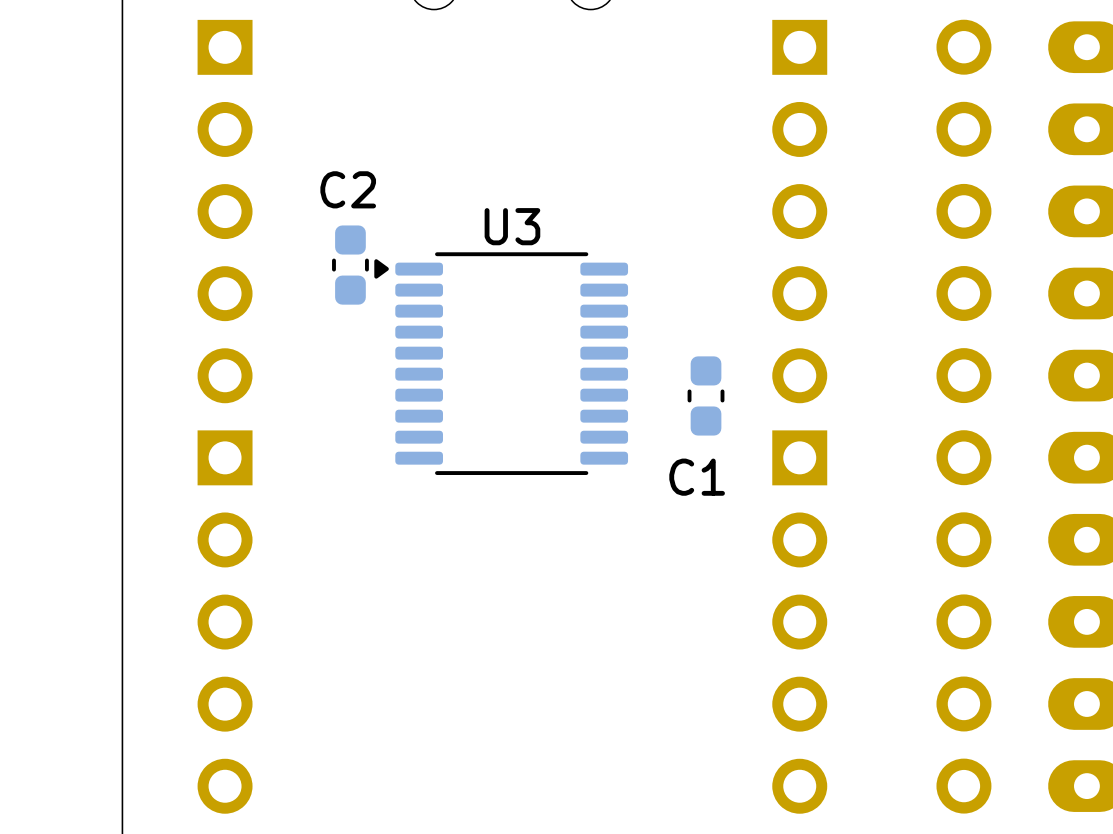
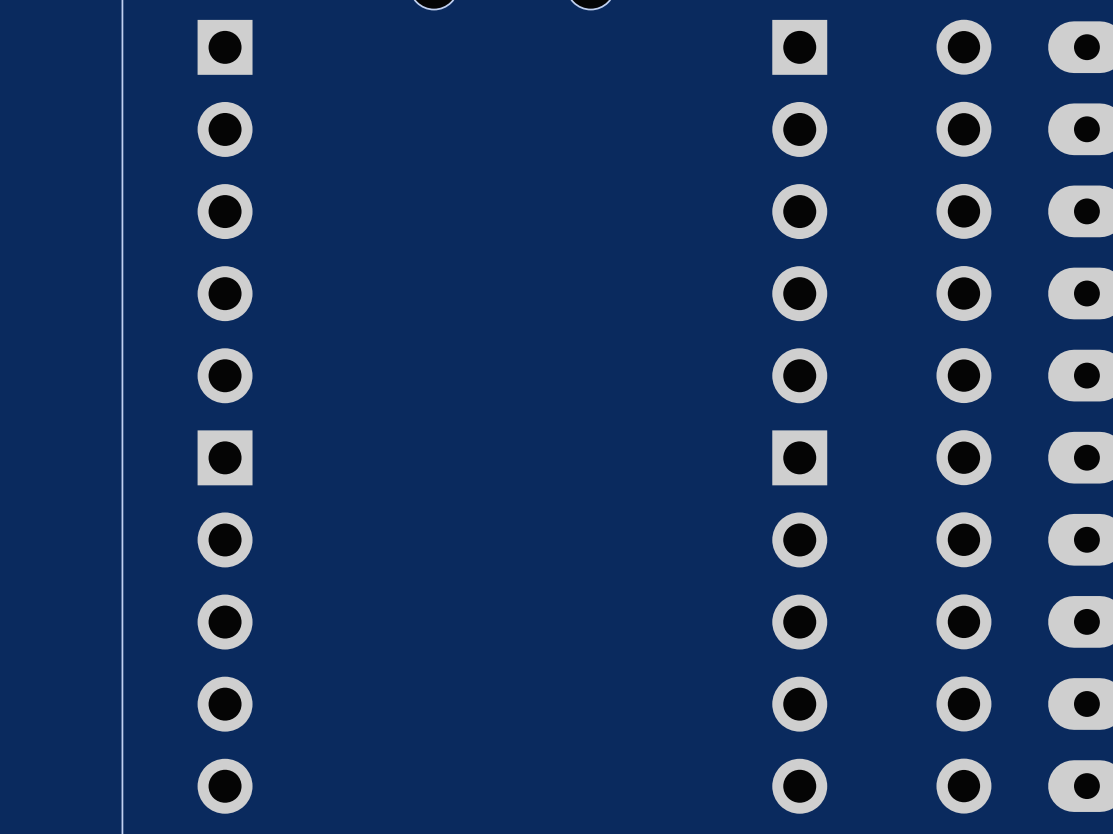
C2: (350, 265) -> none
U3: (501, 363) -> none
C1: (706, 395) -> none

